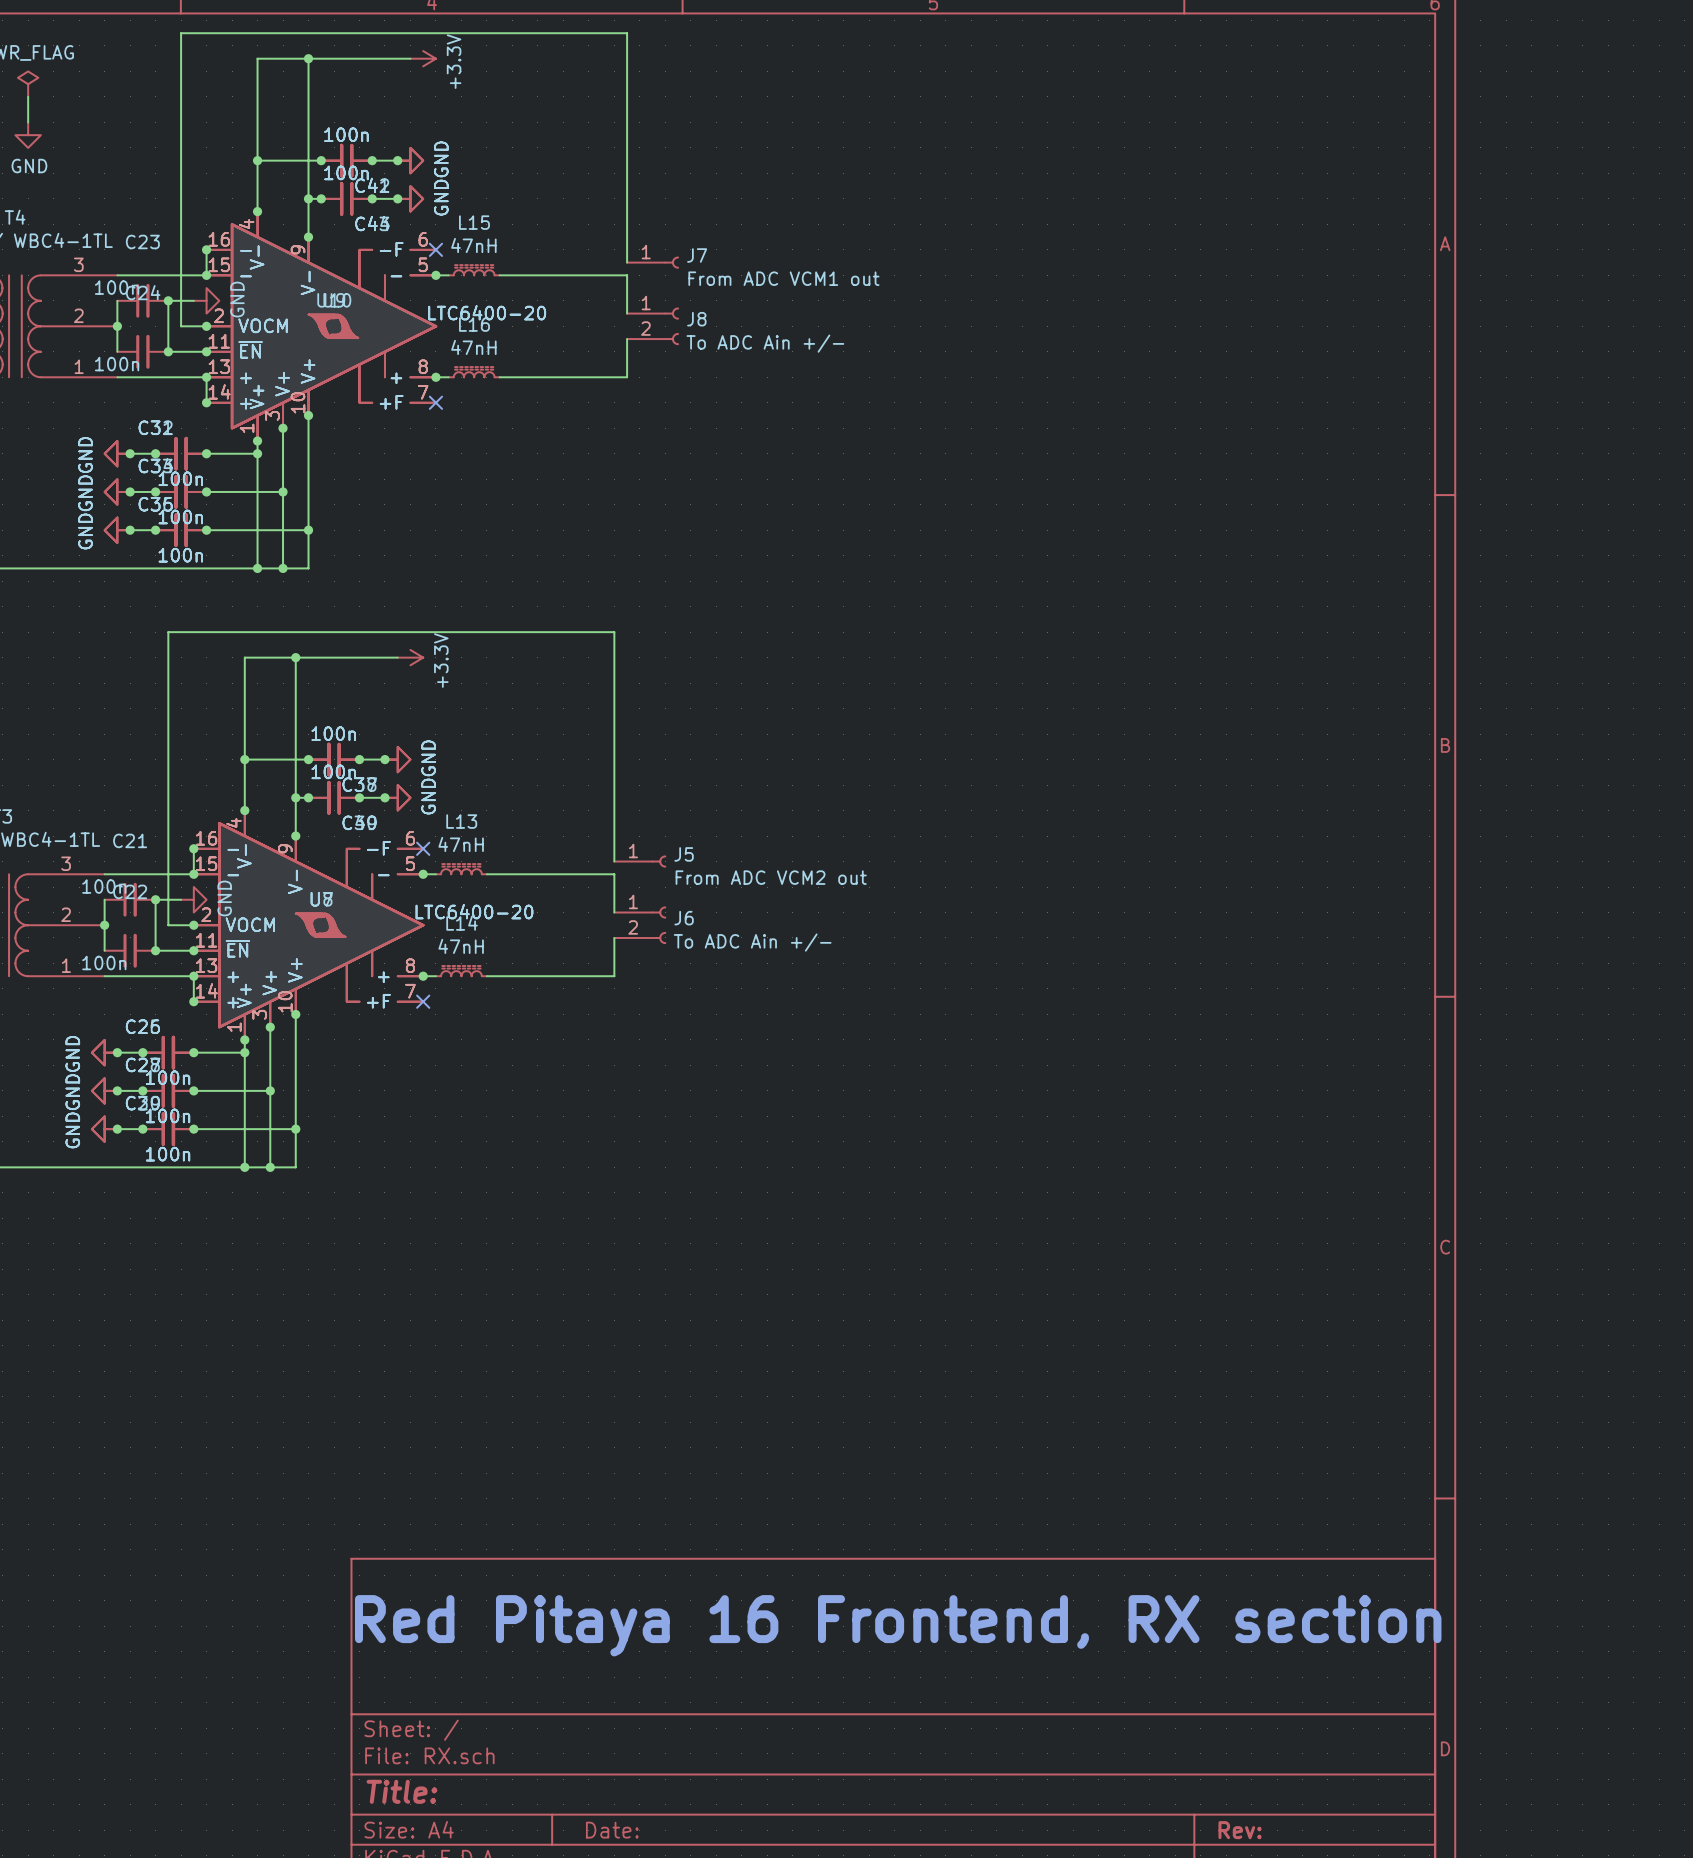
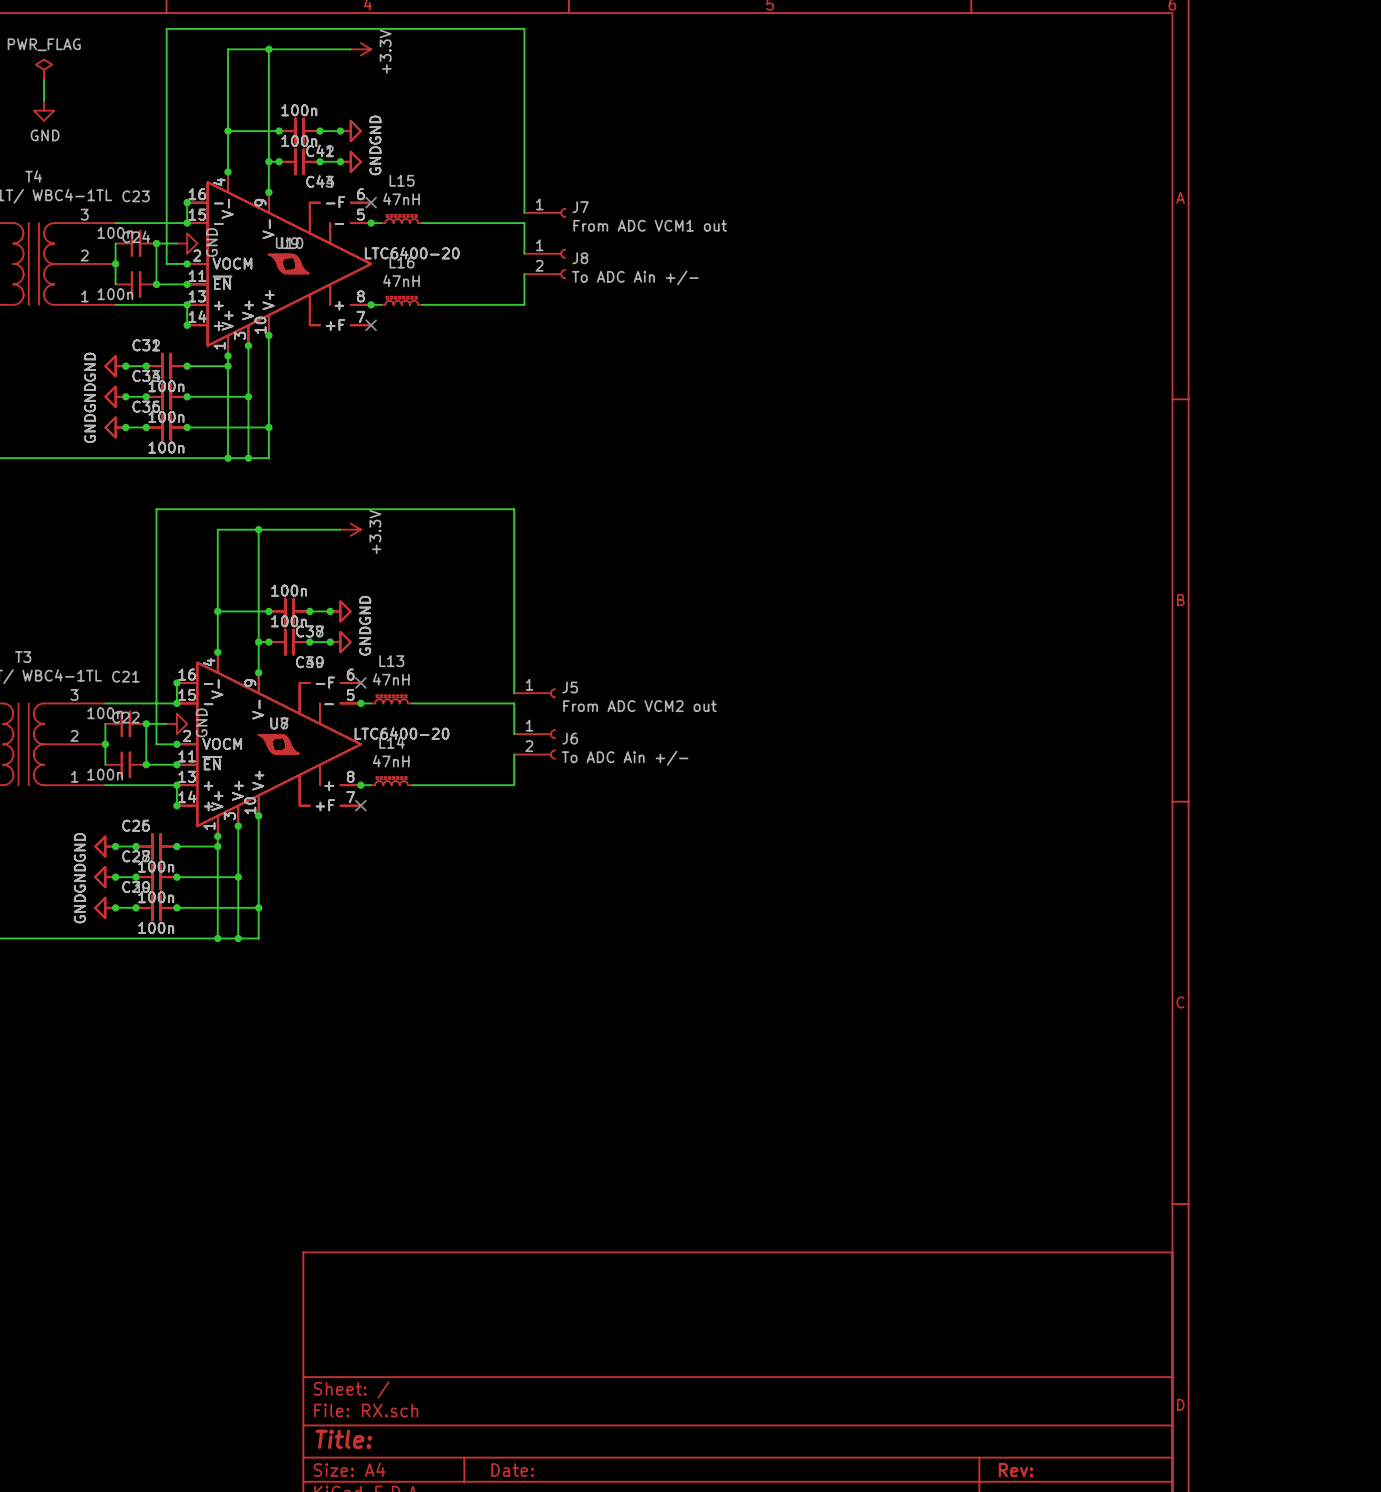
text: Red Pitaya 16 Frontend, RX section (898, 1625) -> none

